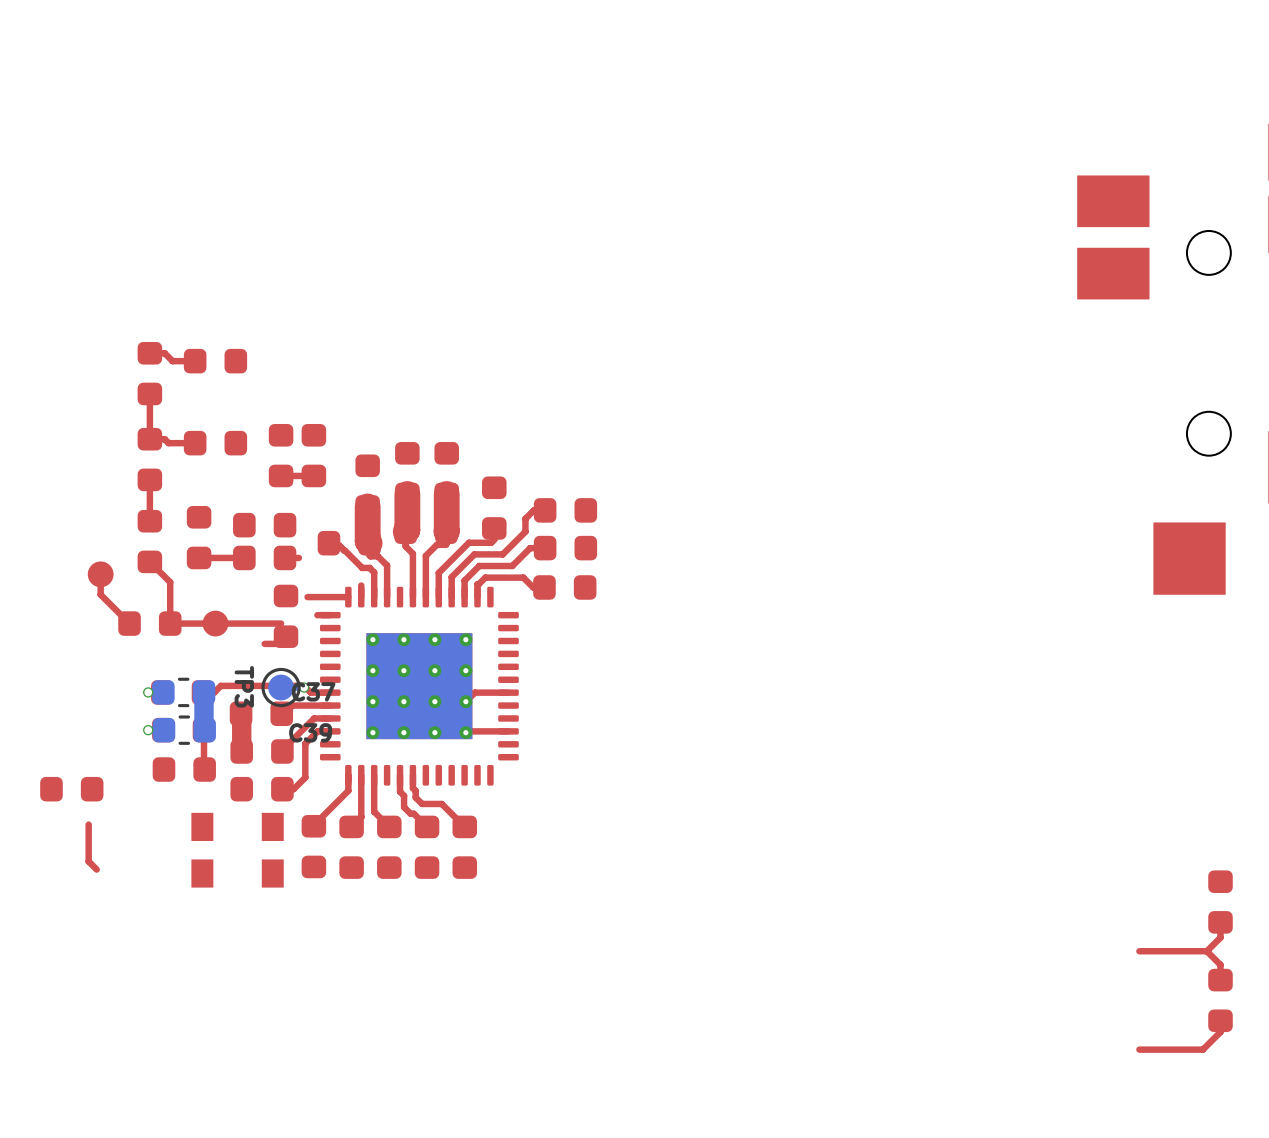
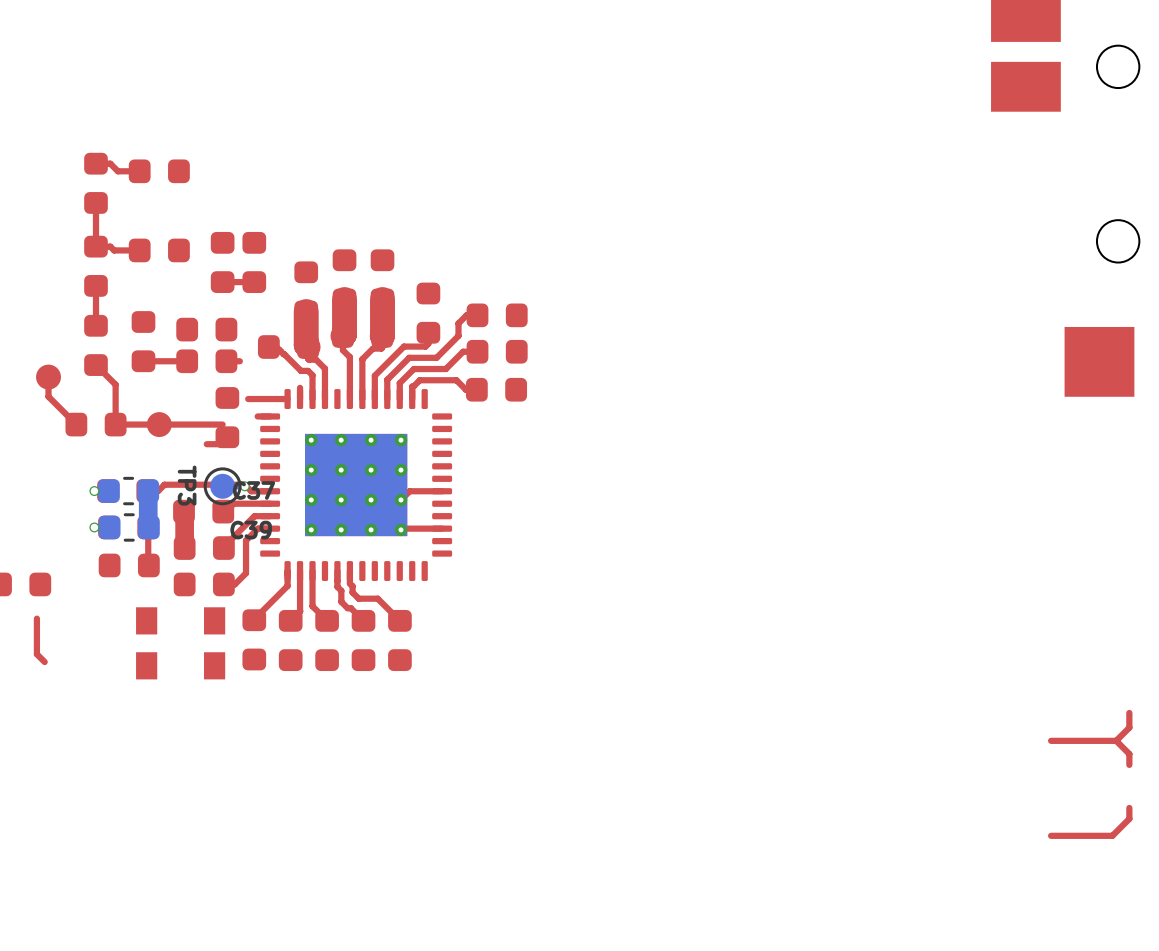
part: (1220, 902) -> none
part: (1220, 1000) -> none

